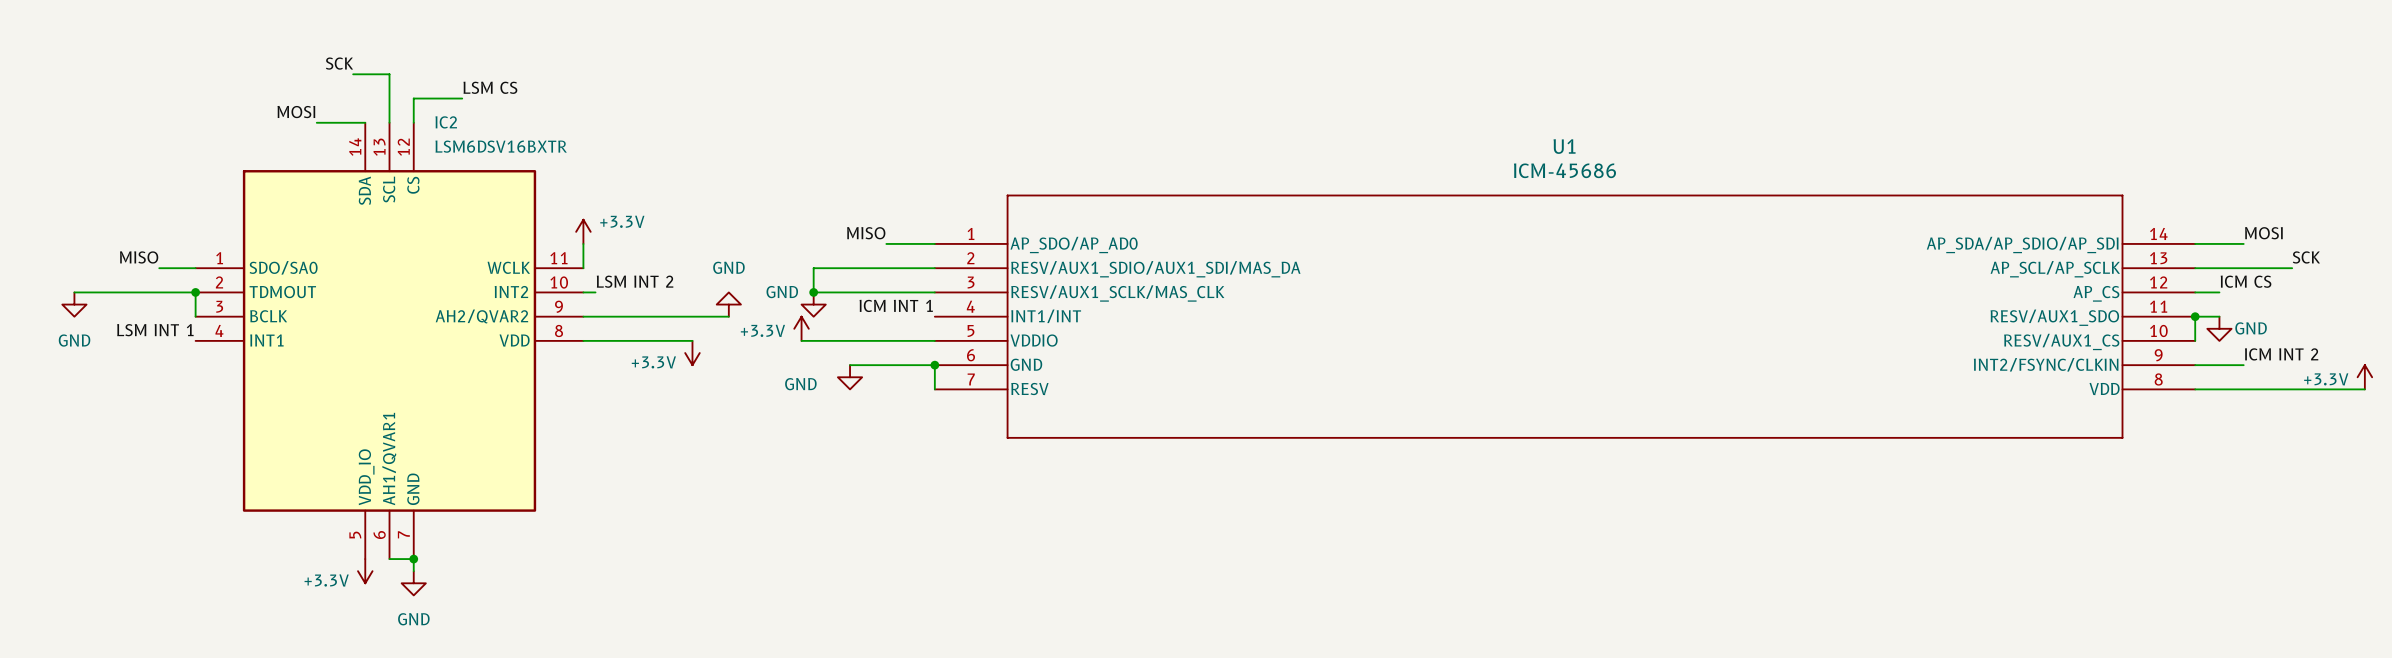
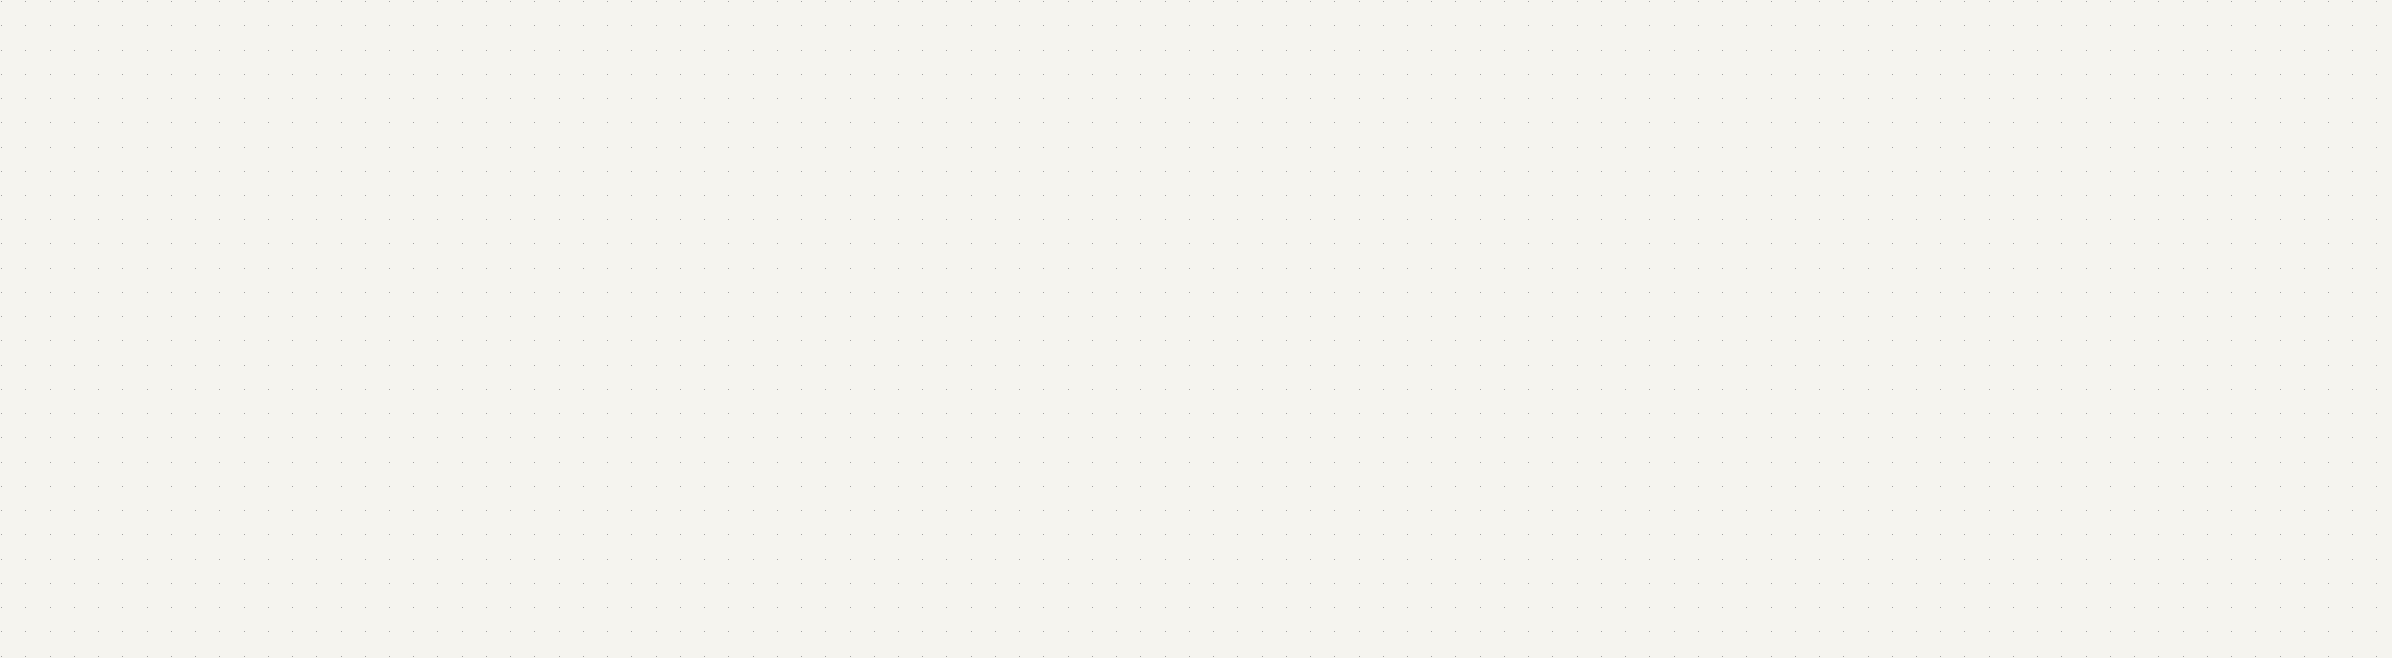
label: SCK (339, 63) -> none
wire: (353, 74) (389, 74) (389, 122) -> none
label: LSM CS (490, 87) -> none
wire: (462, 98) (413, 98) (413, 122) -> none
label: MOSI (296, 112) -> none
wire: (316, 122) (365, 122) -> none
power symbol: +3.3V (583, 231) -> none
label: MISO (866, 233) -> none
label: MOSI (2263, 233) -> none
wire: (583, 243) (583, 268) -> none
wire: (886, 243) (934, 243) -> none
wire: (2195, 243) (2243, 243) -> none
label: MISO (139, 257) -> none
label: SCK (2306, 257) -> none
wire: (159, 268) (195, 268) -> none
wire: (934, 268) (813, 268) (813, 292) (934, 292) -> none
wire: (2195, 268) (2292, 268) -> none
label: LSM INT 2 (635, 281) -> none
label: ICM CS (2246, 281) -> none
wire: (74, 292) (195, 292) (195, 316) -> none
junction: (195, 292) -> none
wire: (583, 292) (595, 292) -> none
junction: (813, 292) -> none
wire: (2195, 292) (2219, 292) -> none
power symbol: GND (74, 304) -> none
power symbol: GND (728, 304) -> none
power symbol: GND (813, 304) -> none
label: ICM INT 1 (896, 305) -> none
wire: (583, 316) (728, 316) -> none
U1: ICM-45686 (1565, 316) -> none
junction: (2195, 316) -> none
wire: (2219, 316) (2195, 316) (2195, 340) -> none
power symbol: +3.3V (801, 328) -> none
power symbol: GND (2219, 328) -> none
label: LSM INT 1 (155, 330) -> none
IC2: LSM6DSV16BXTR (389, 340) -> none
wire: (583, 340) (692, 340) -> none
wire: (801, 340) (934, 340) -> none
power symbol: +3.3V (692, 353) -> none
label: ICM INT 2 (2281, 354) -> none
wire: (850, 365) (934, 365) (934, 389) -> none
junction: (934, 365) -> none
wire: (2195, 365) (2243, 365) -> none
power symbol: GND (850, 377) -> none
power symbol: +3.3V (2364, 377) -> none
wire: (2195, 389) (2364, 389) -> none
wire: (389, 559) (413, 559) (413, 571) -> none
junction: (413, 559) -> none
power symbol: +3.3V (365, 571) -> none
power symbol: GND (413, 583) -> none

